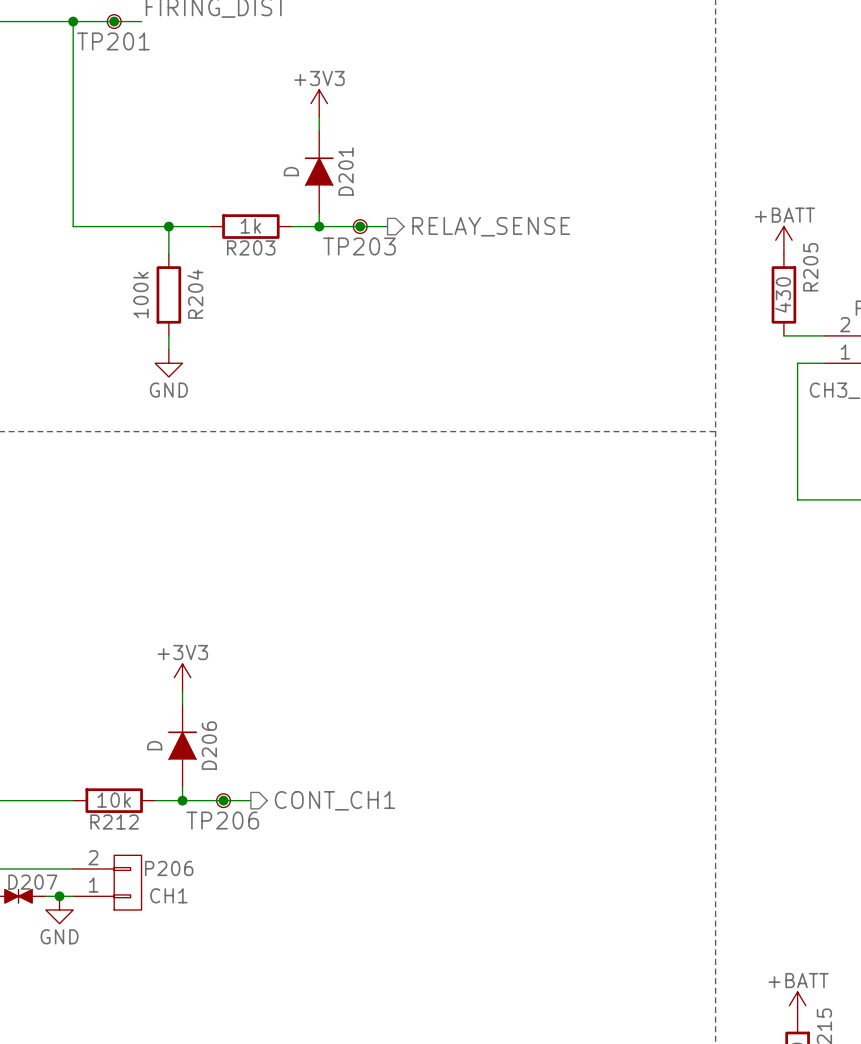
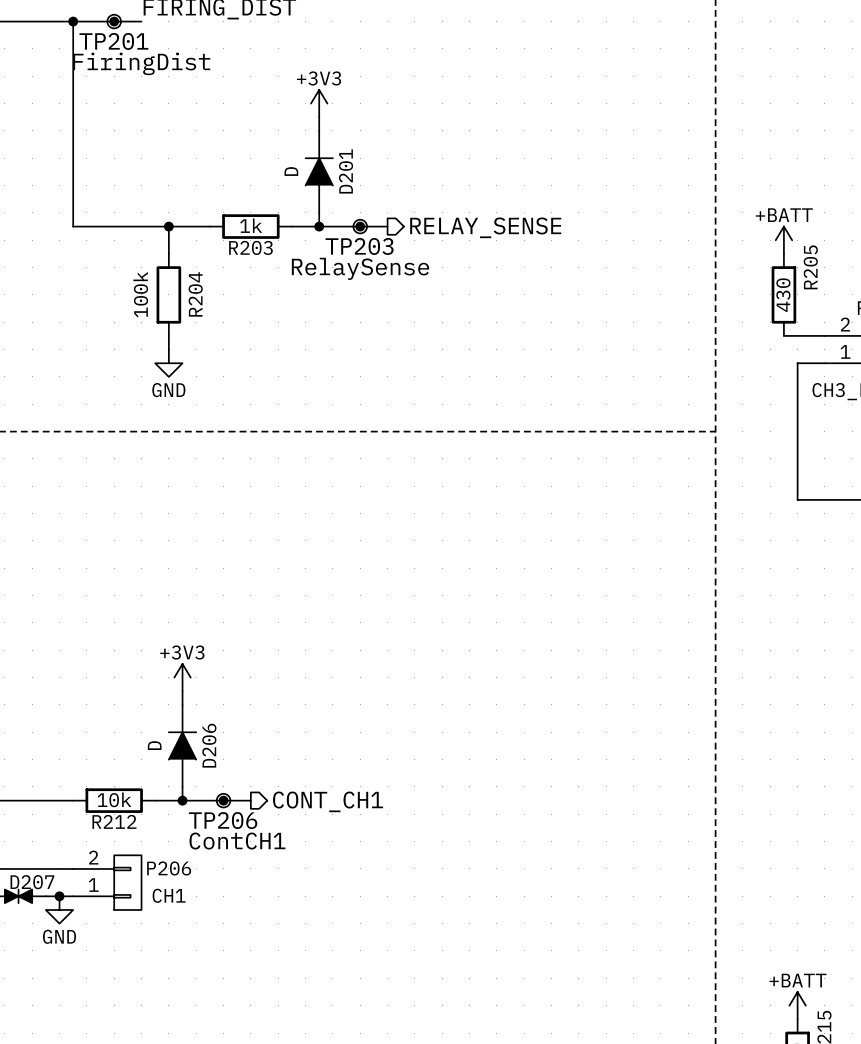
TP201 value: none -> FiringDist (141, 63)
TP203 value: none -> RelaySense (360, 268)
TP206 value: none -> ContCH1 (237, 841)

